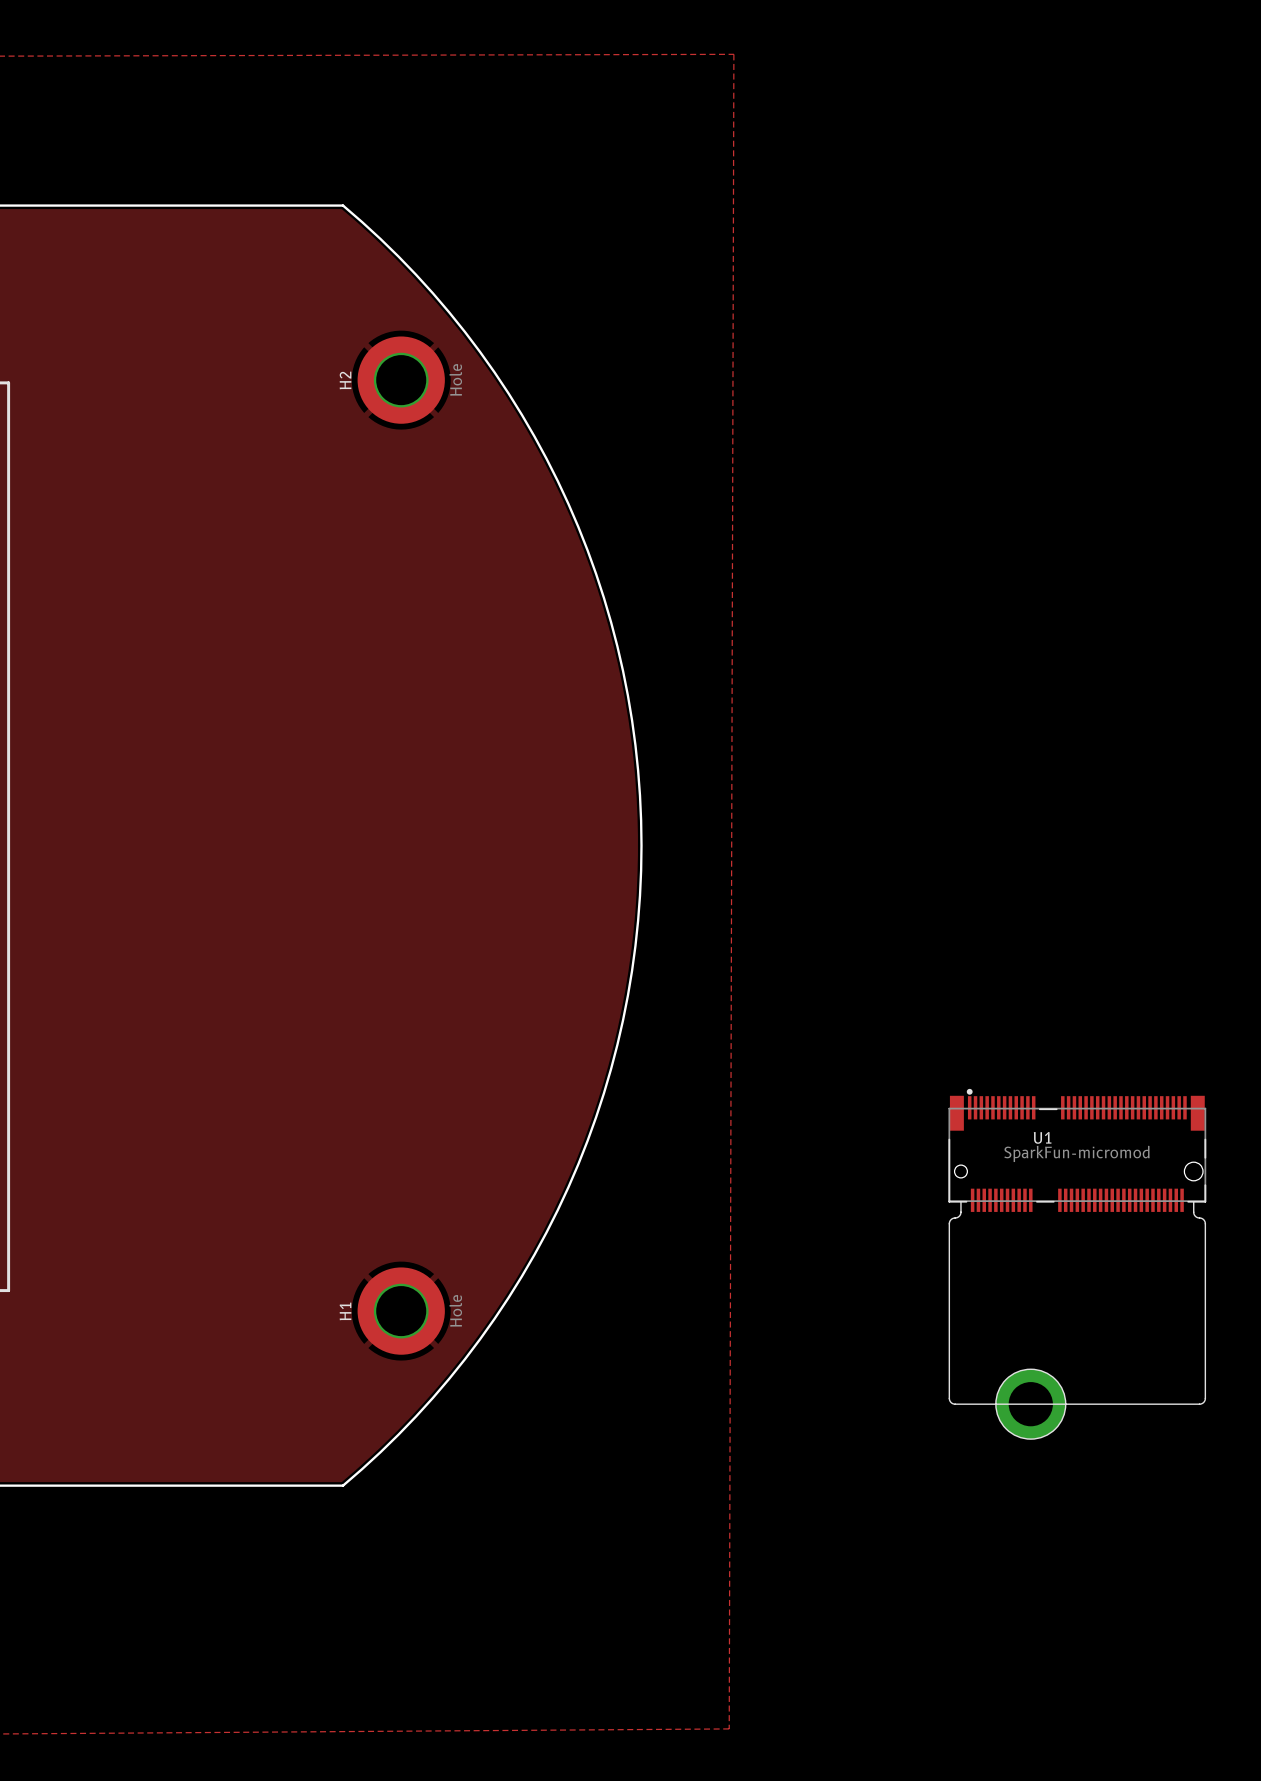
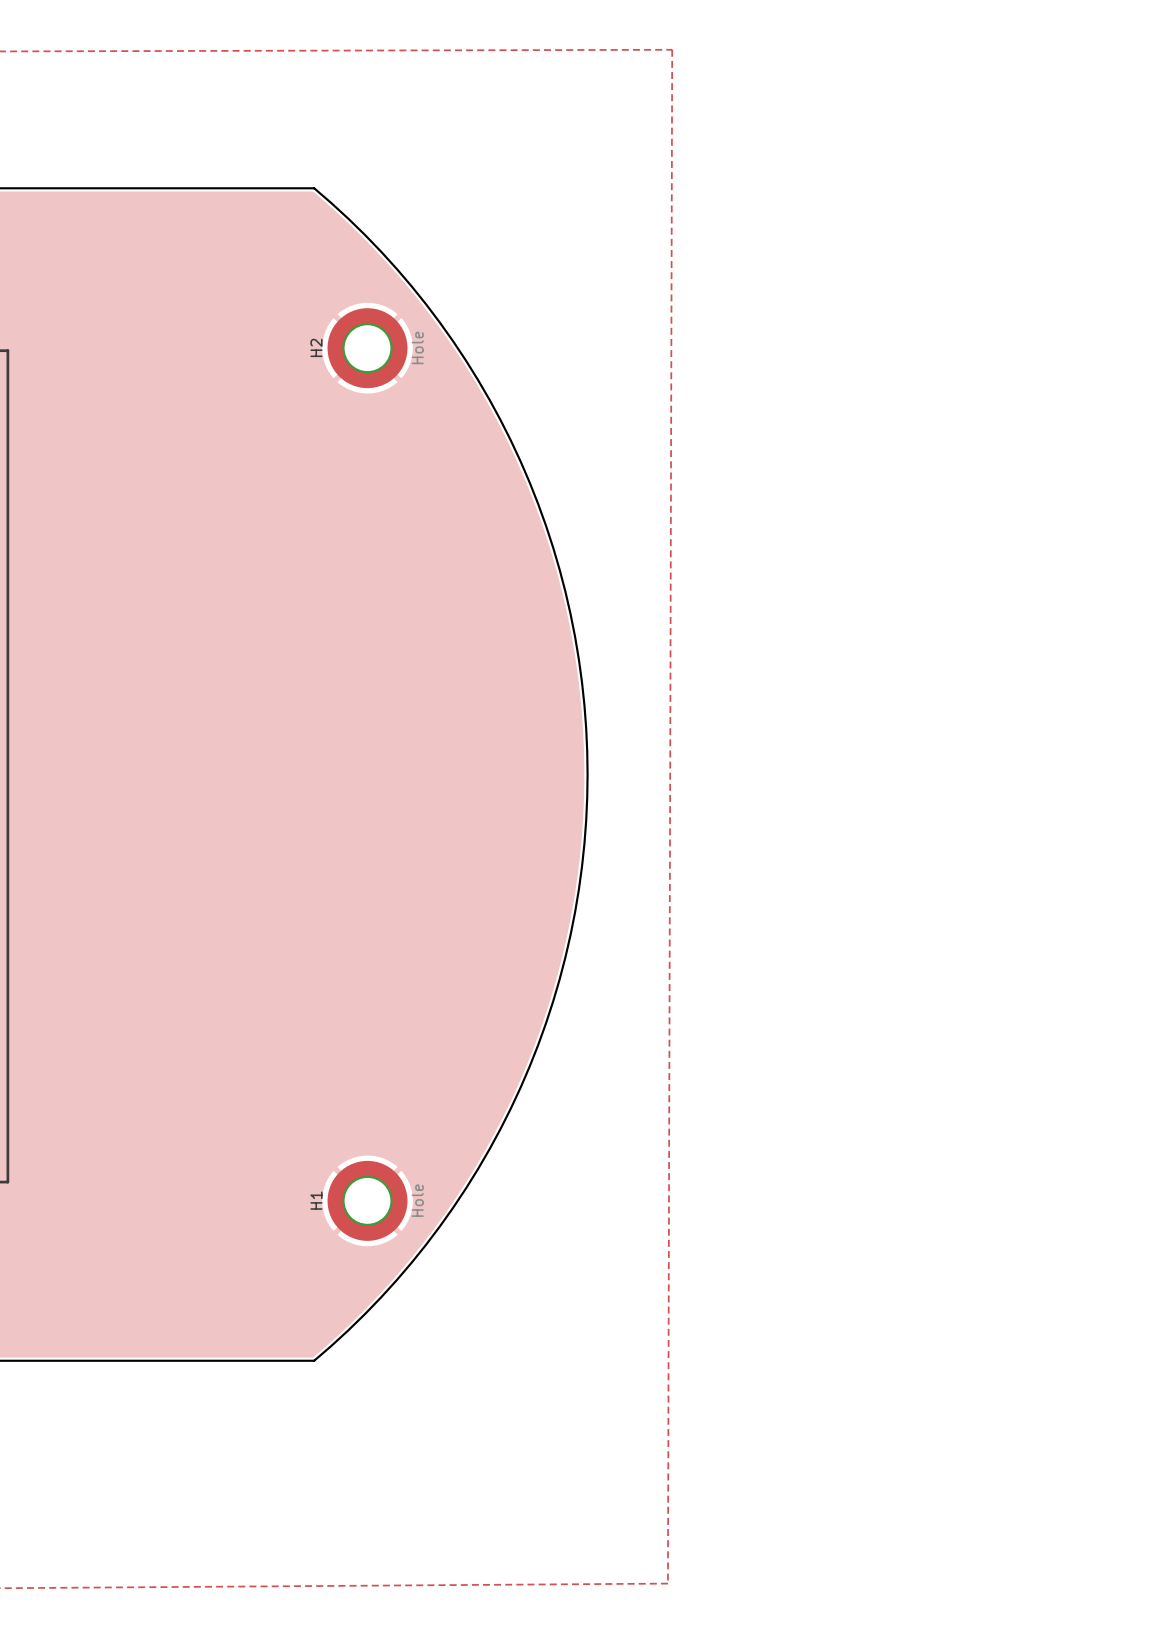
U1: SparkFun-micromod (1077, 1264) -> none

